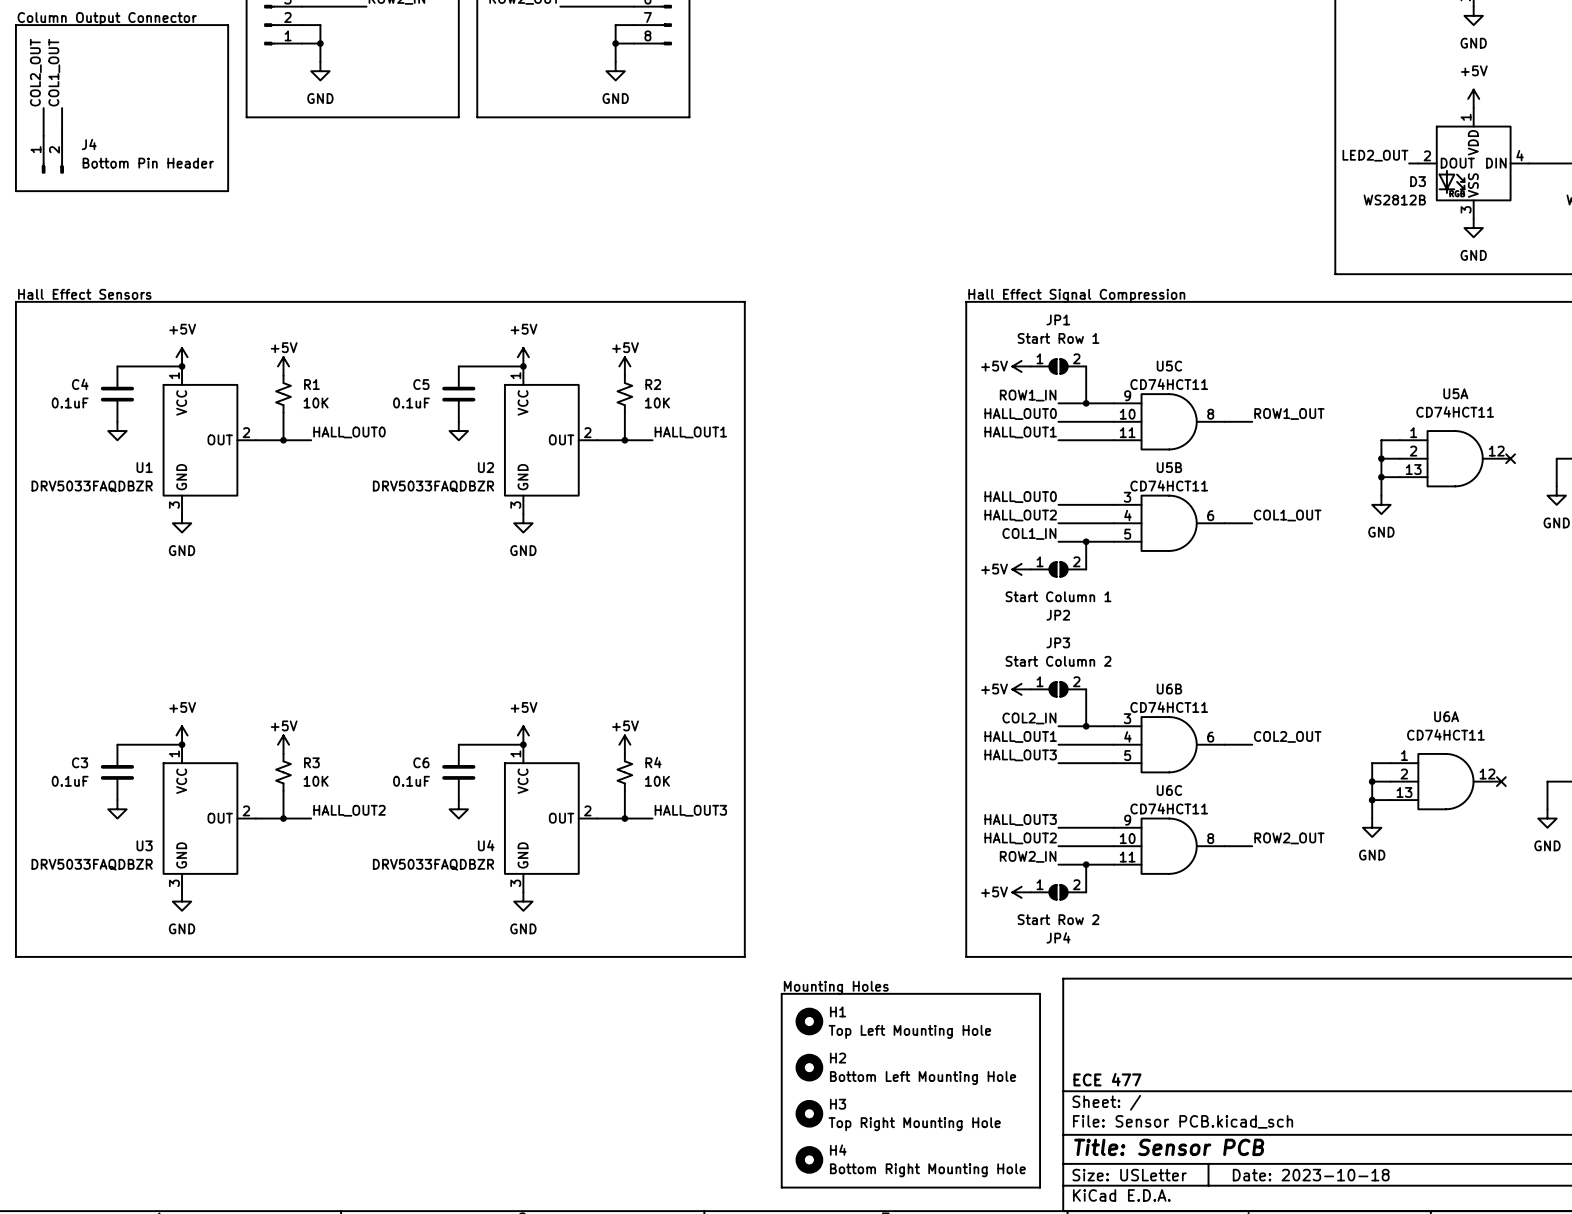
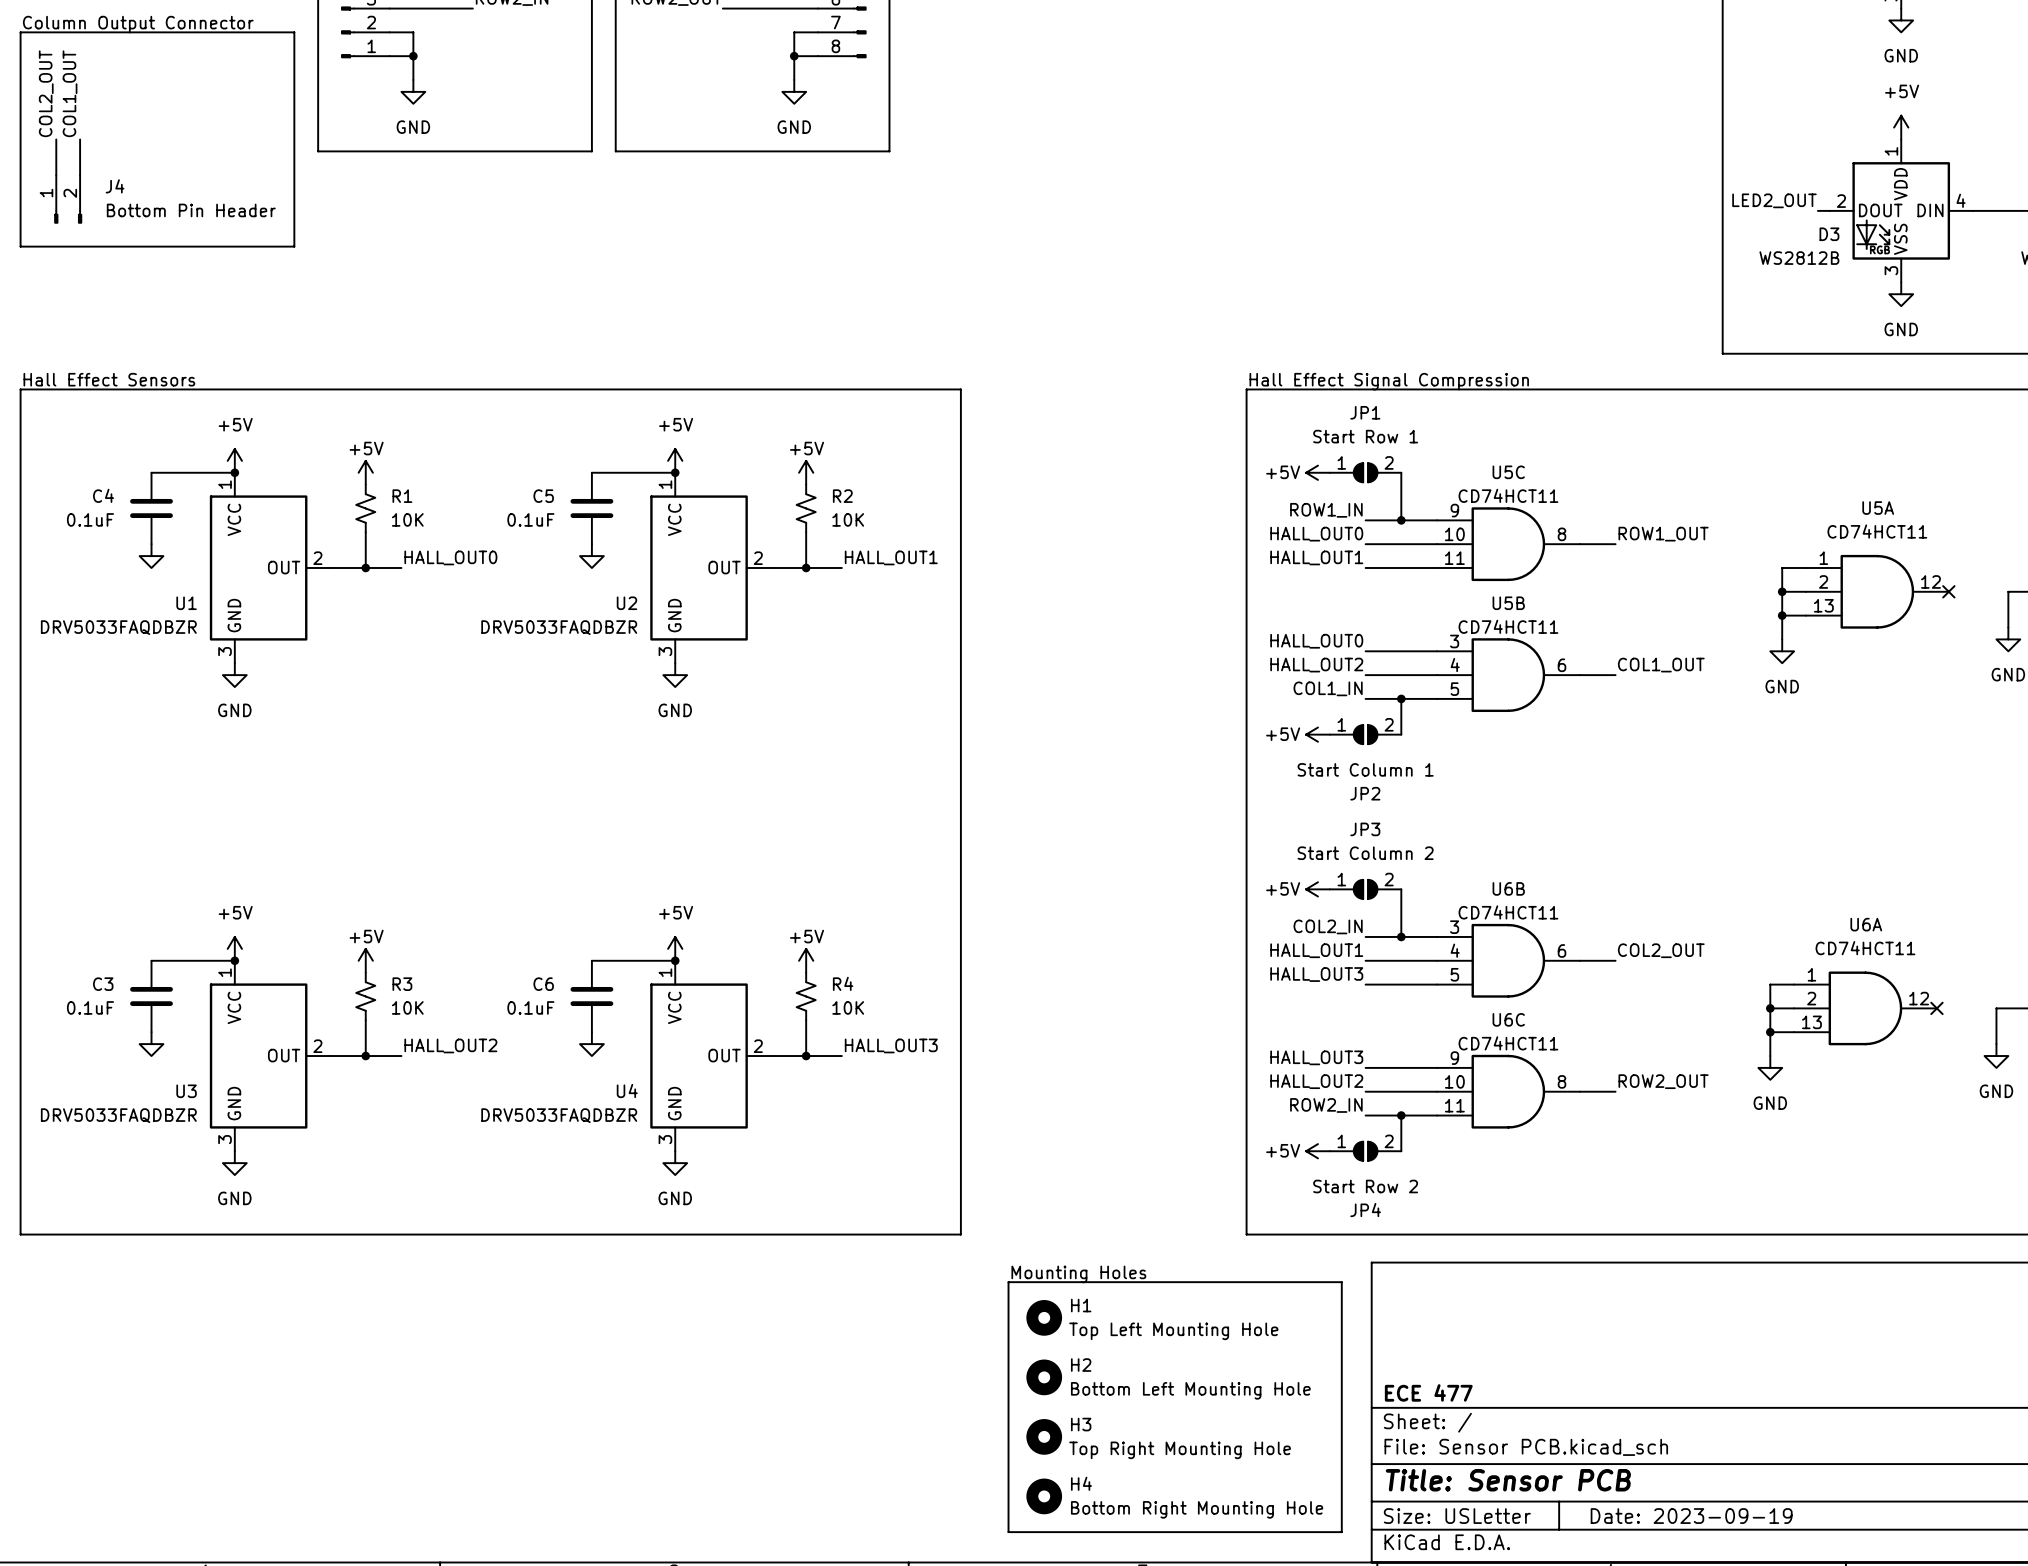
title block: Date: 2023-10-18 (1311, 1175) -> Date: 2023-09-19 (1691, 1516)

